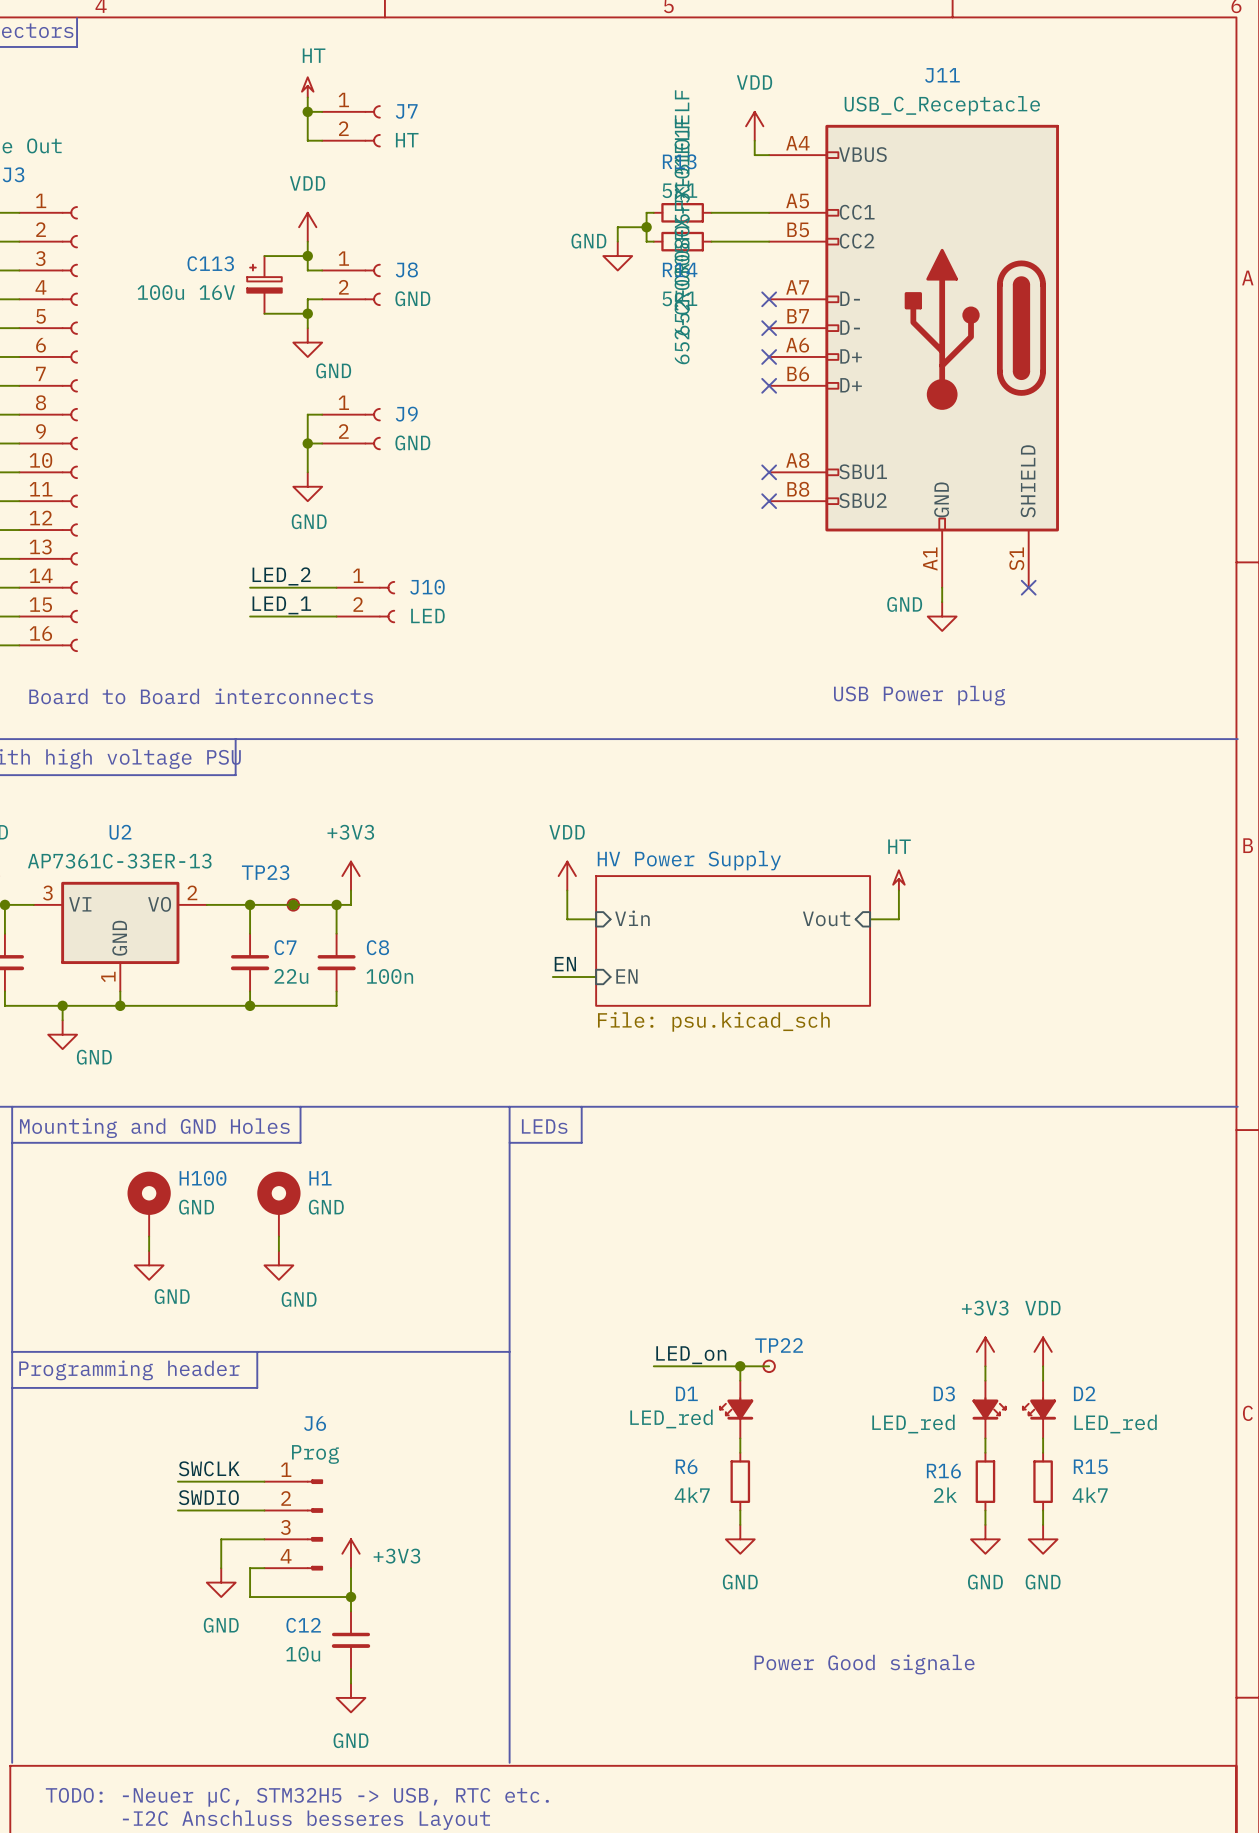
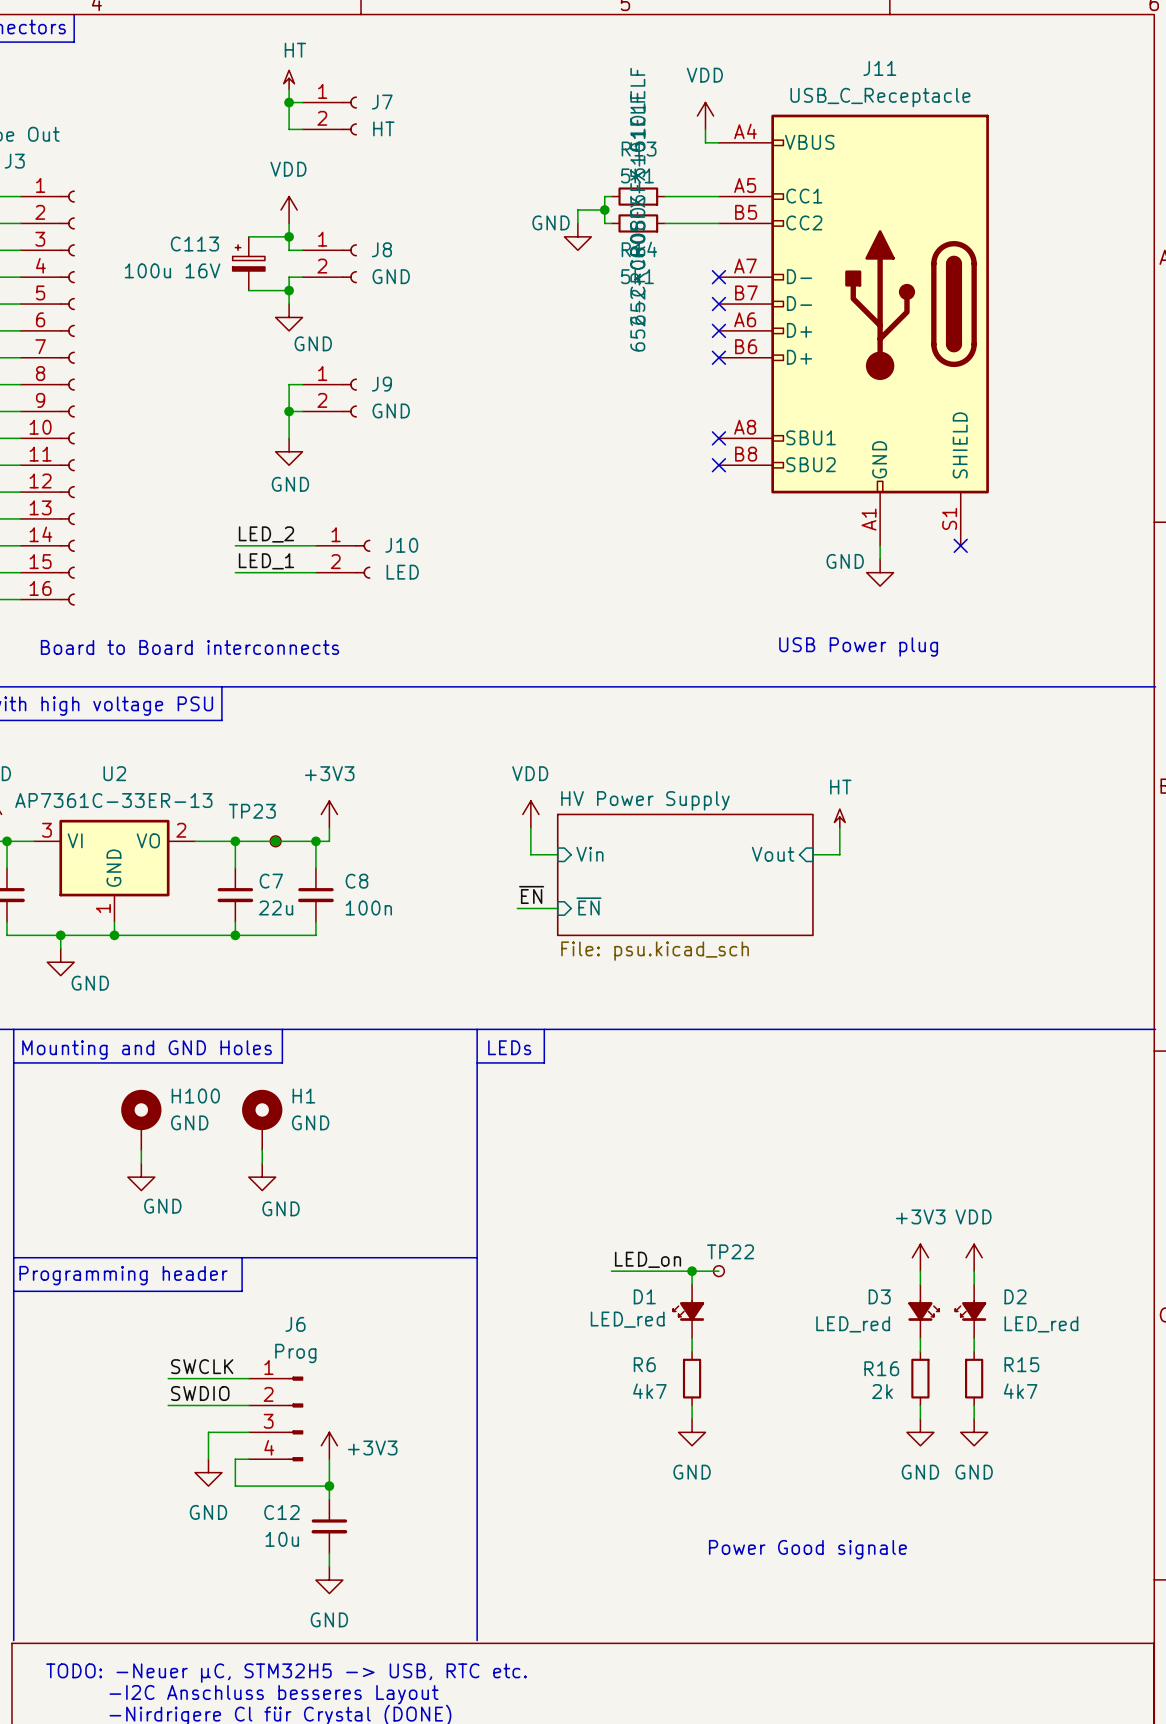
label: EN (565, 964) -> ~{EN} (531, 894)
sheet pin: EN (626, 976) -> ~{EN} (588, 906)

